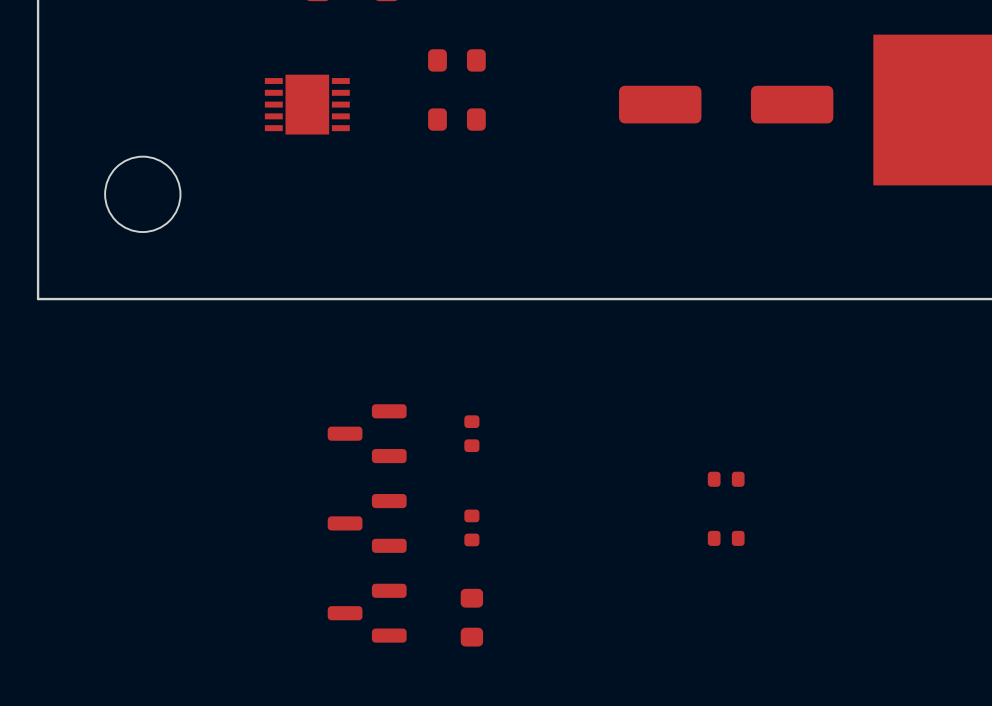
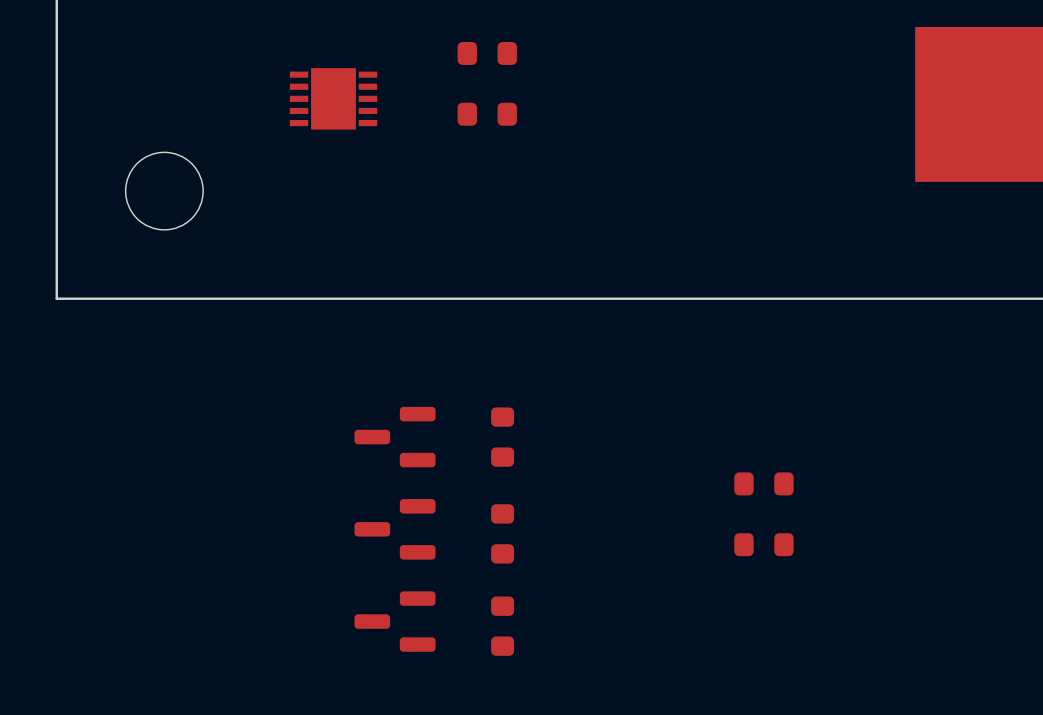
part: (726, 104) -> none
part footprint: [464, 415, 480, 453] -> [491, 407, 515, 467]
part footprint: [707, 471, 745, 487] -> [734, 472, 794, 496]
part footprint: [464, 509, 480, 547] -> [491, 504, 515, 564]
part footprint: [707, 530, 745, 546] -> [734, 533, 794, 557]

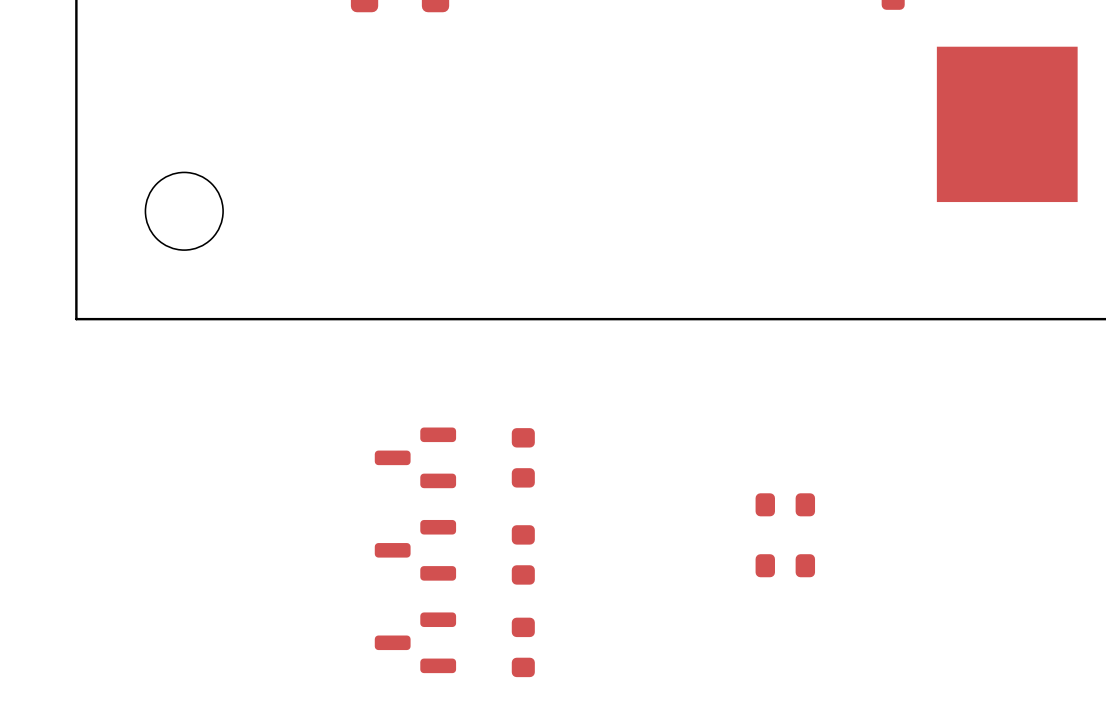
part: (487, 53) -> none
part: (333, 98) -> none
part: (487, 114) -> none

